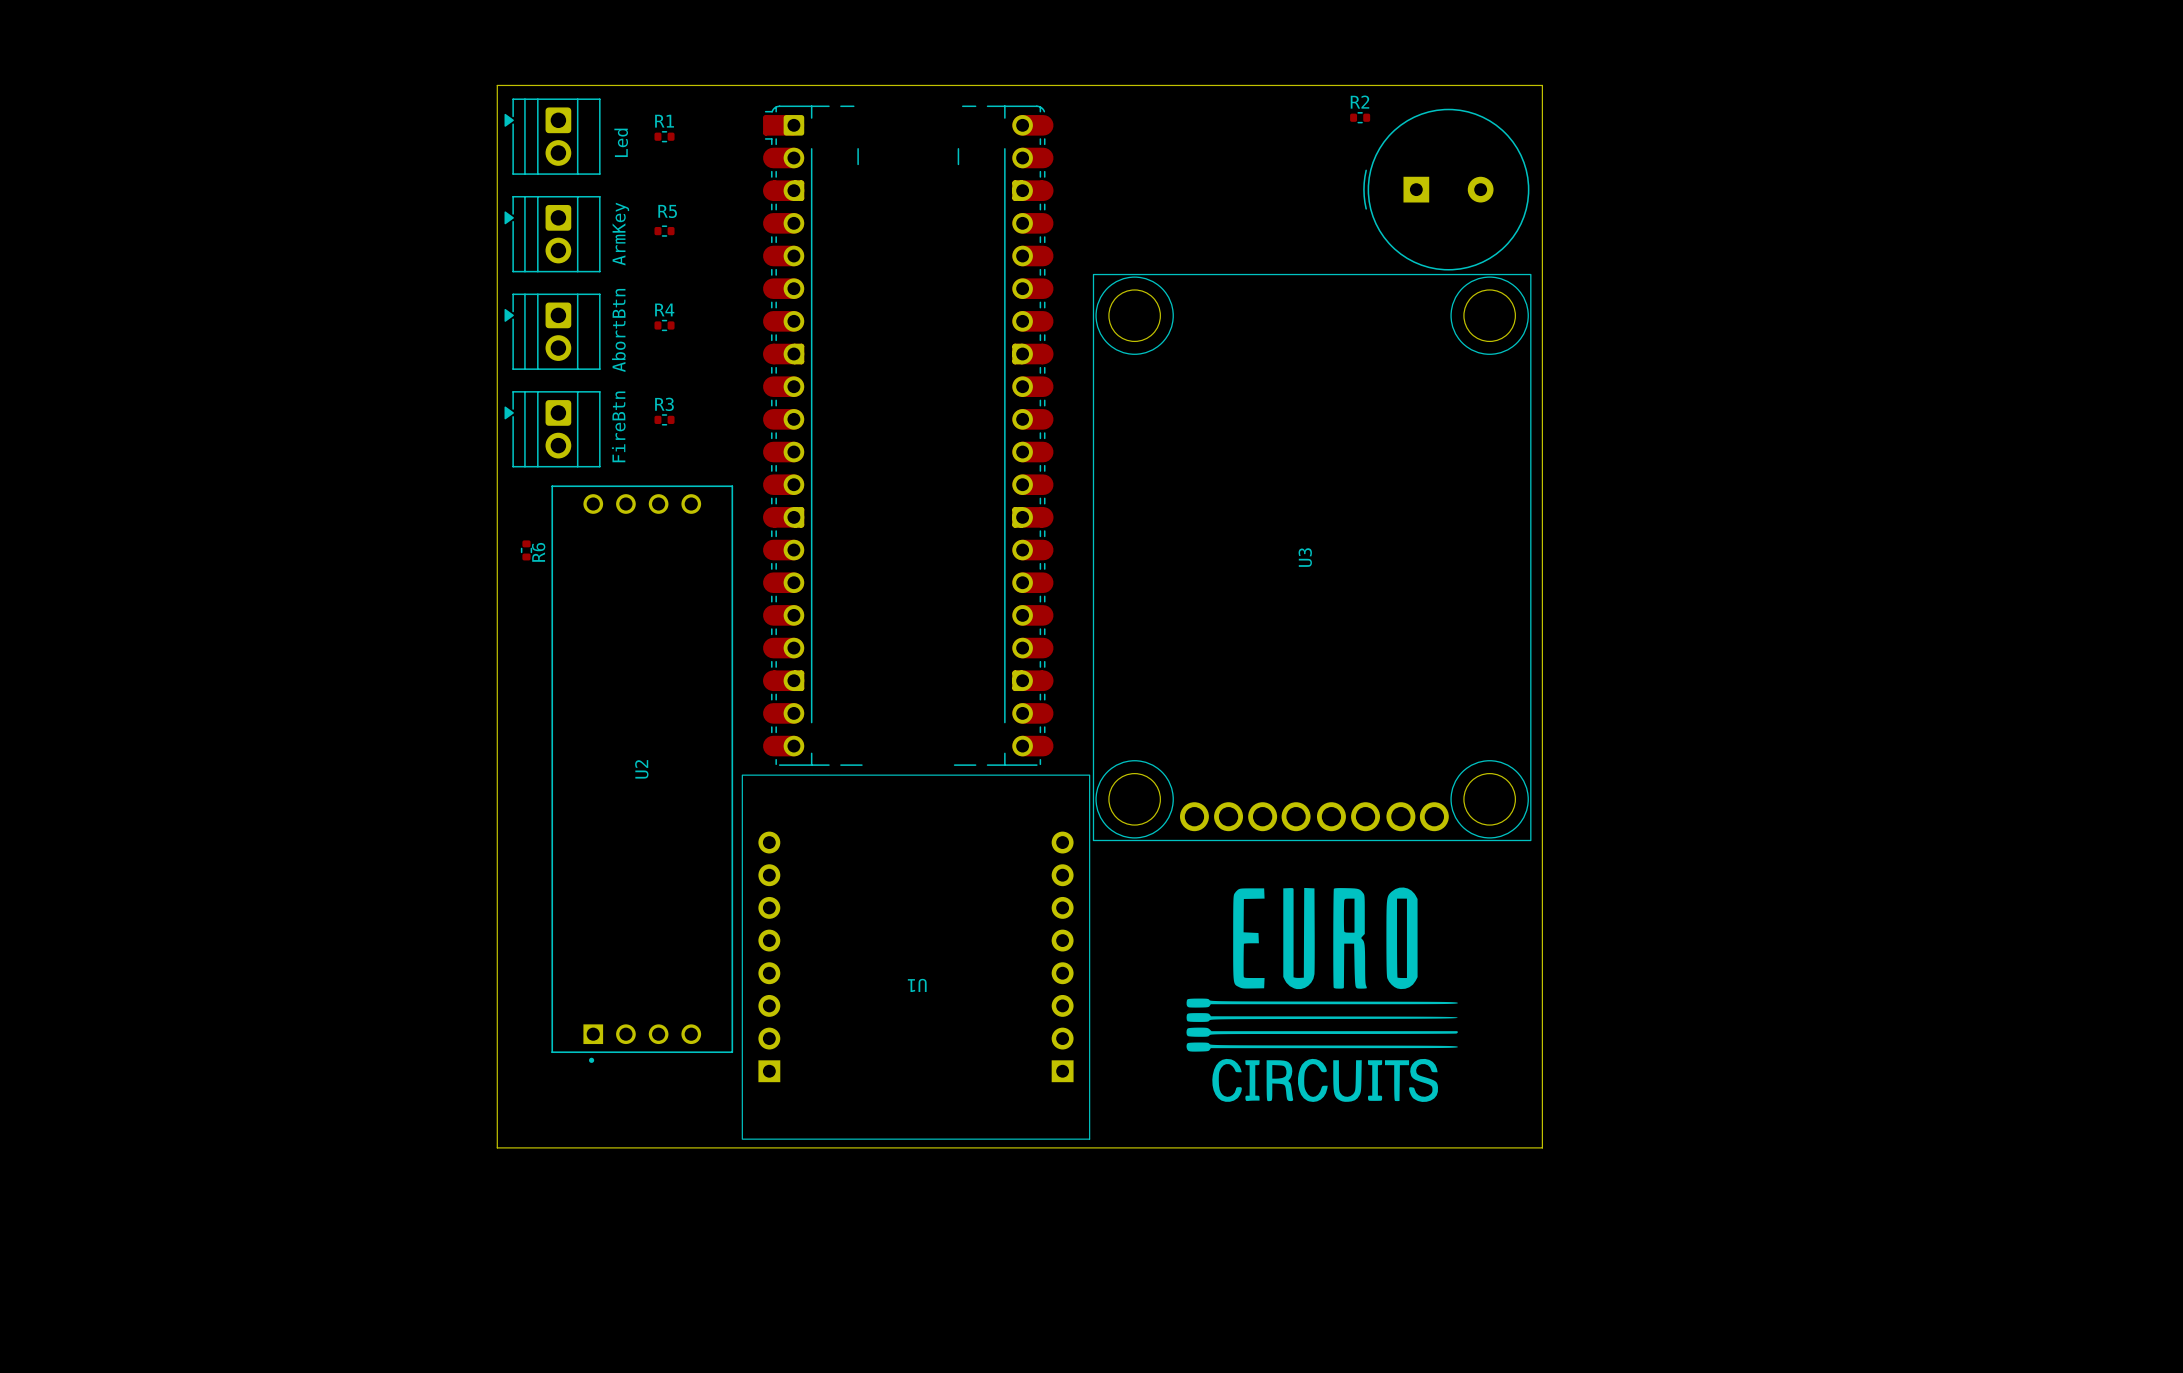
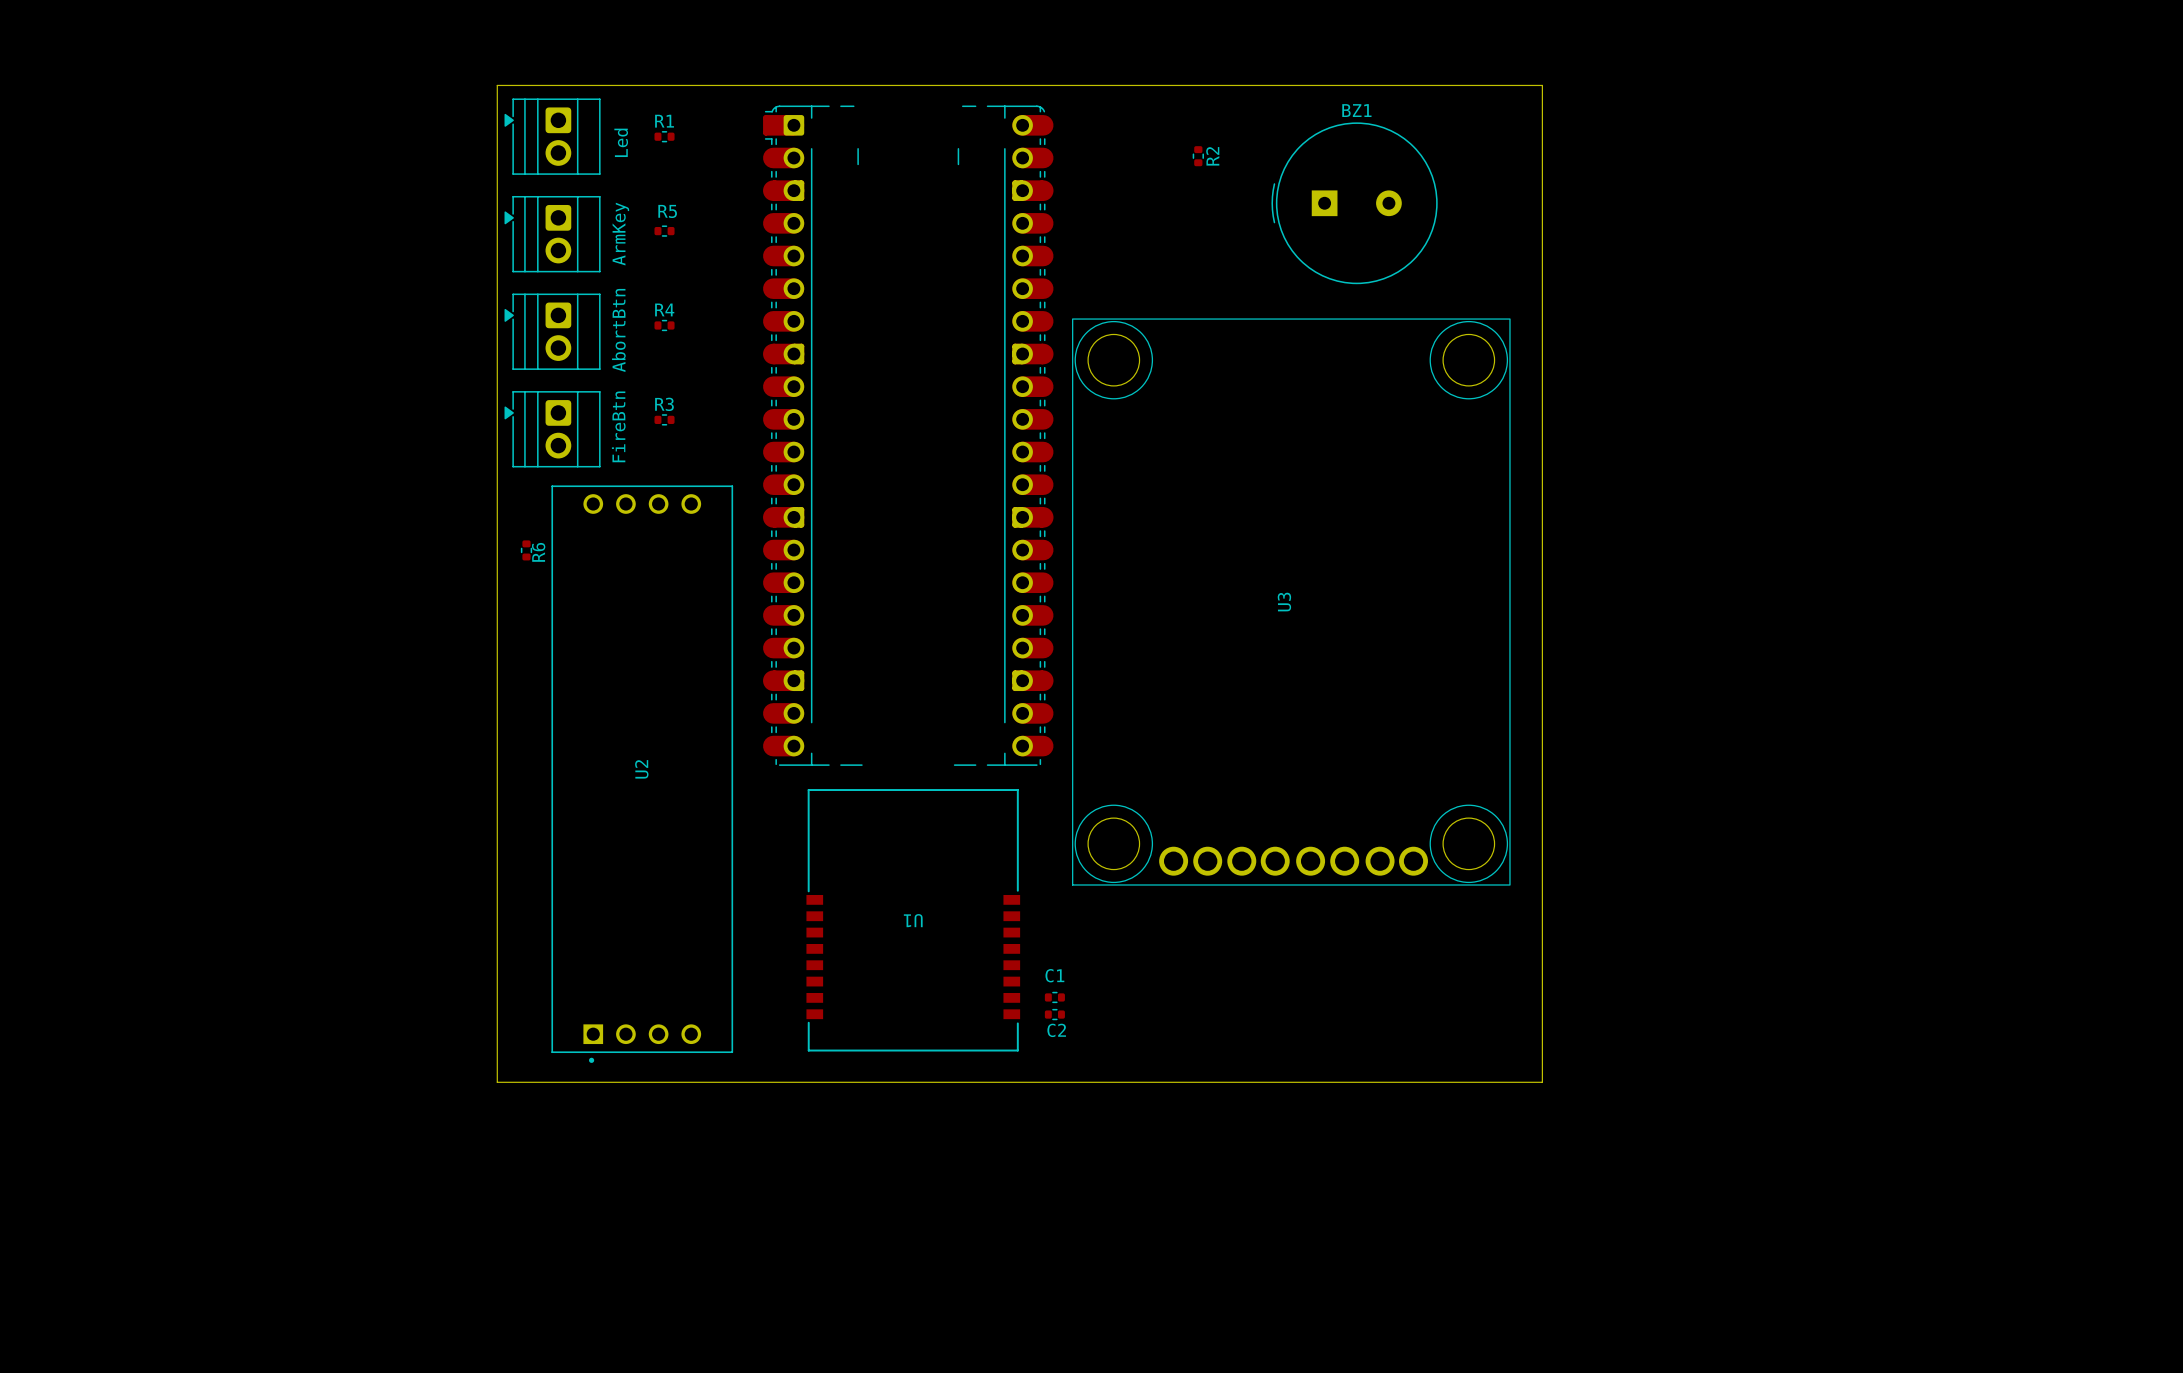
R2 rotation: 0° (1360, 117) -> 90° clockwise (1198, 156)
R2 position: (1360, 117) -> (1198, 156)
part: (1446, 189) -> none
BZ1: none -> (1354, 203)
U3 position: (1312, 557) -> (1291, 602)
U1 footprint: [742, 774, 1090, 1140] -> [806, 789, 1021, 1052]
drawing: [1186, 887, 1458, 1102] -> none
U1 name position: U1 (917, 985) -> U1 (913, 920)
C1: none -> (1054, 997)
C2: none -> (1054, 1014)
board edge: (497, 1082) (497, 1147) (1542, 1147) (1542, 1082) -> (497, 1082) (1542, 1082)

